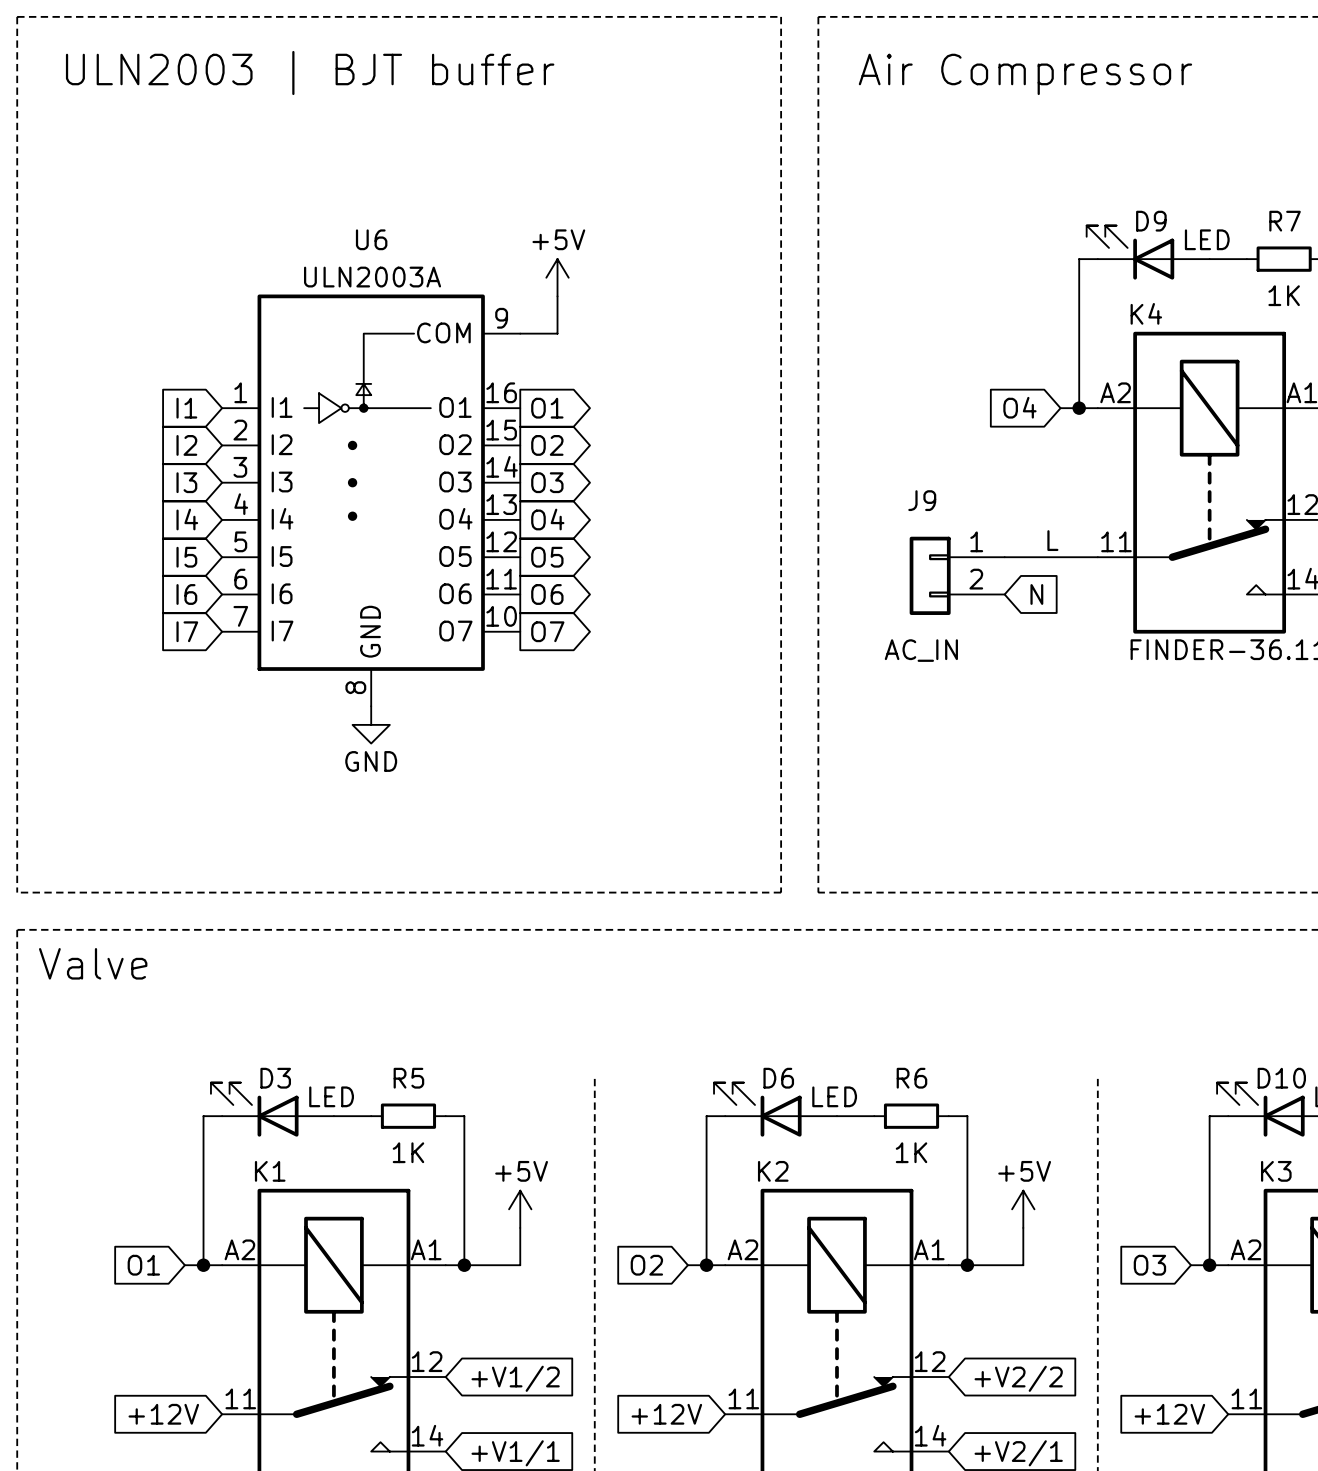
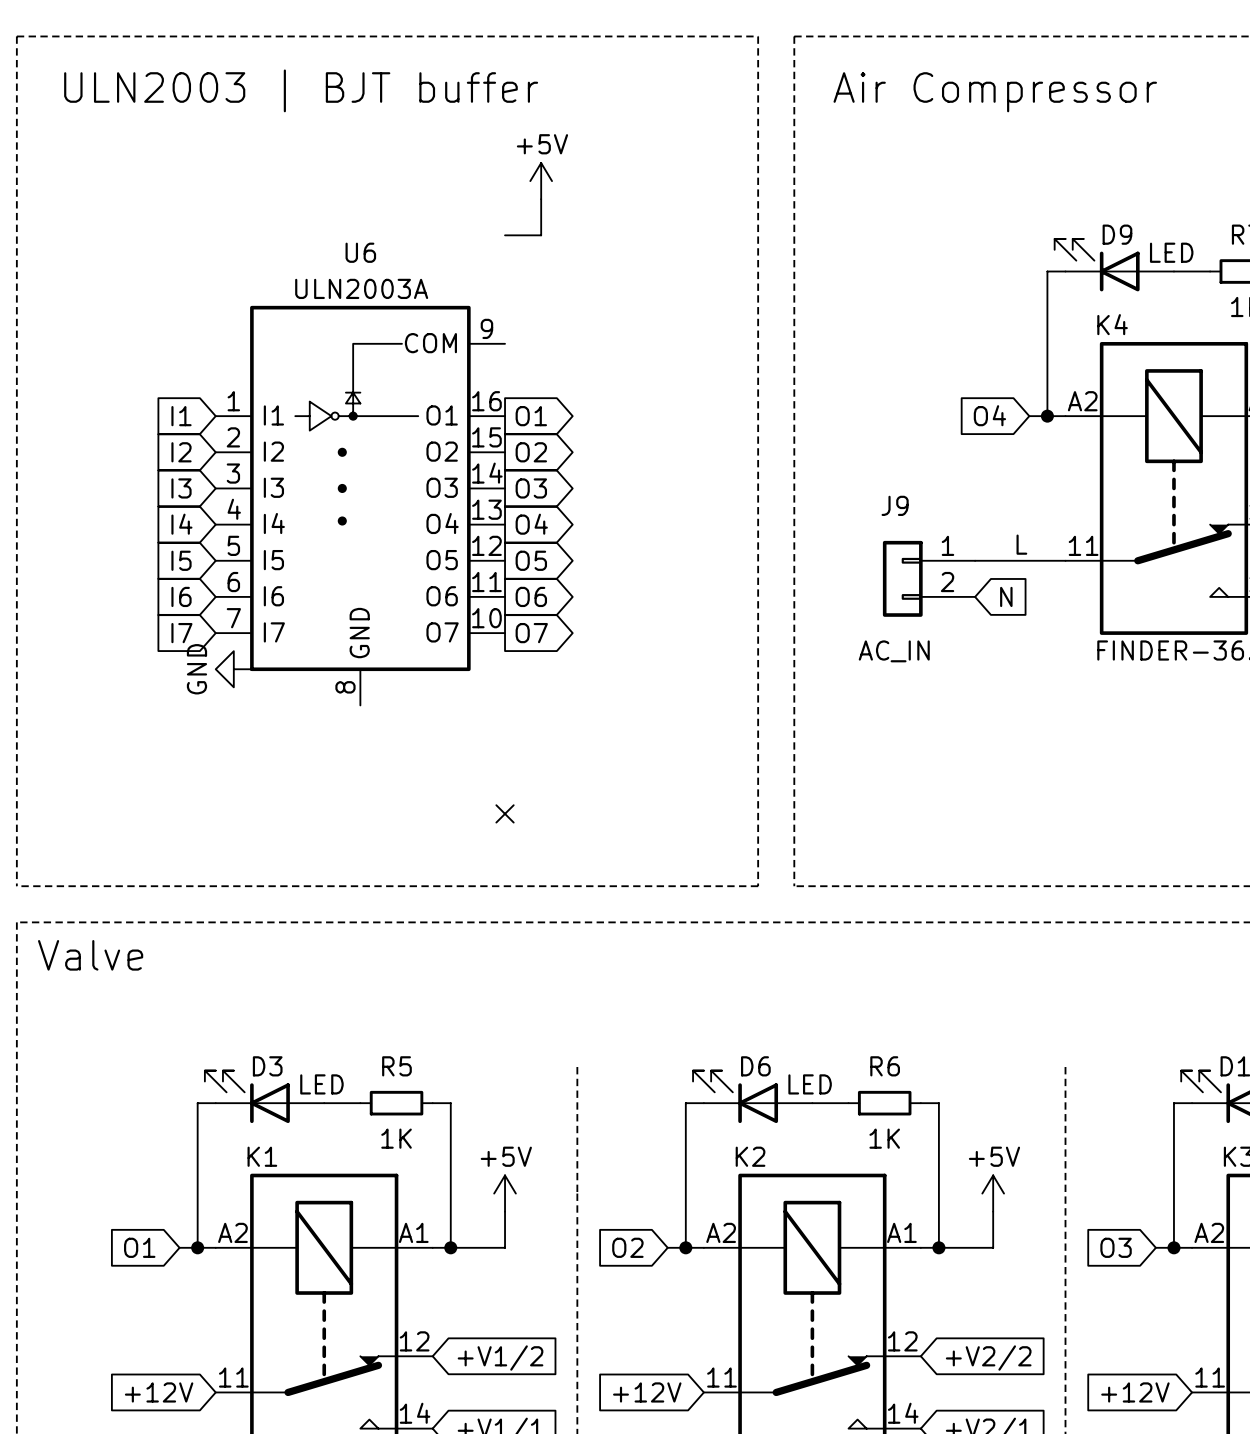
power symbol position: +5V (557, 277) -> +5V (541, 181)
wire: (557, 296) (557, 333) (520, 333) -> (541, 199) (541, 235) (505, 235)
power symbol rotation: 0° (371, 724) -> 90° clockwise (233, 669)
power symbol position: GND (371, 724) -> GND (233, 669)
no-connect mark: none -> (505, 813)

